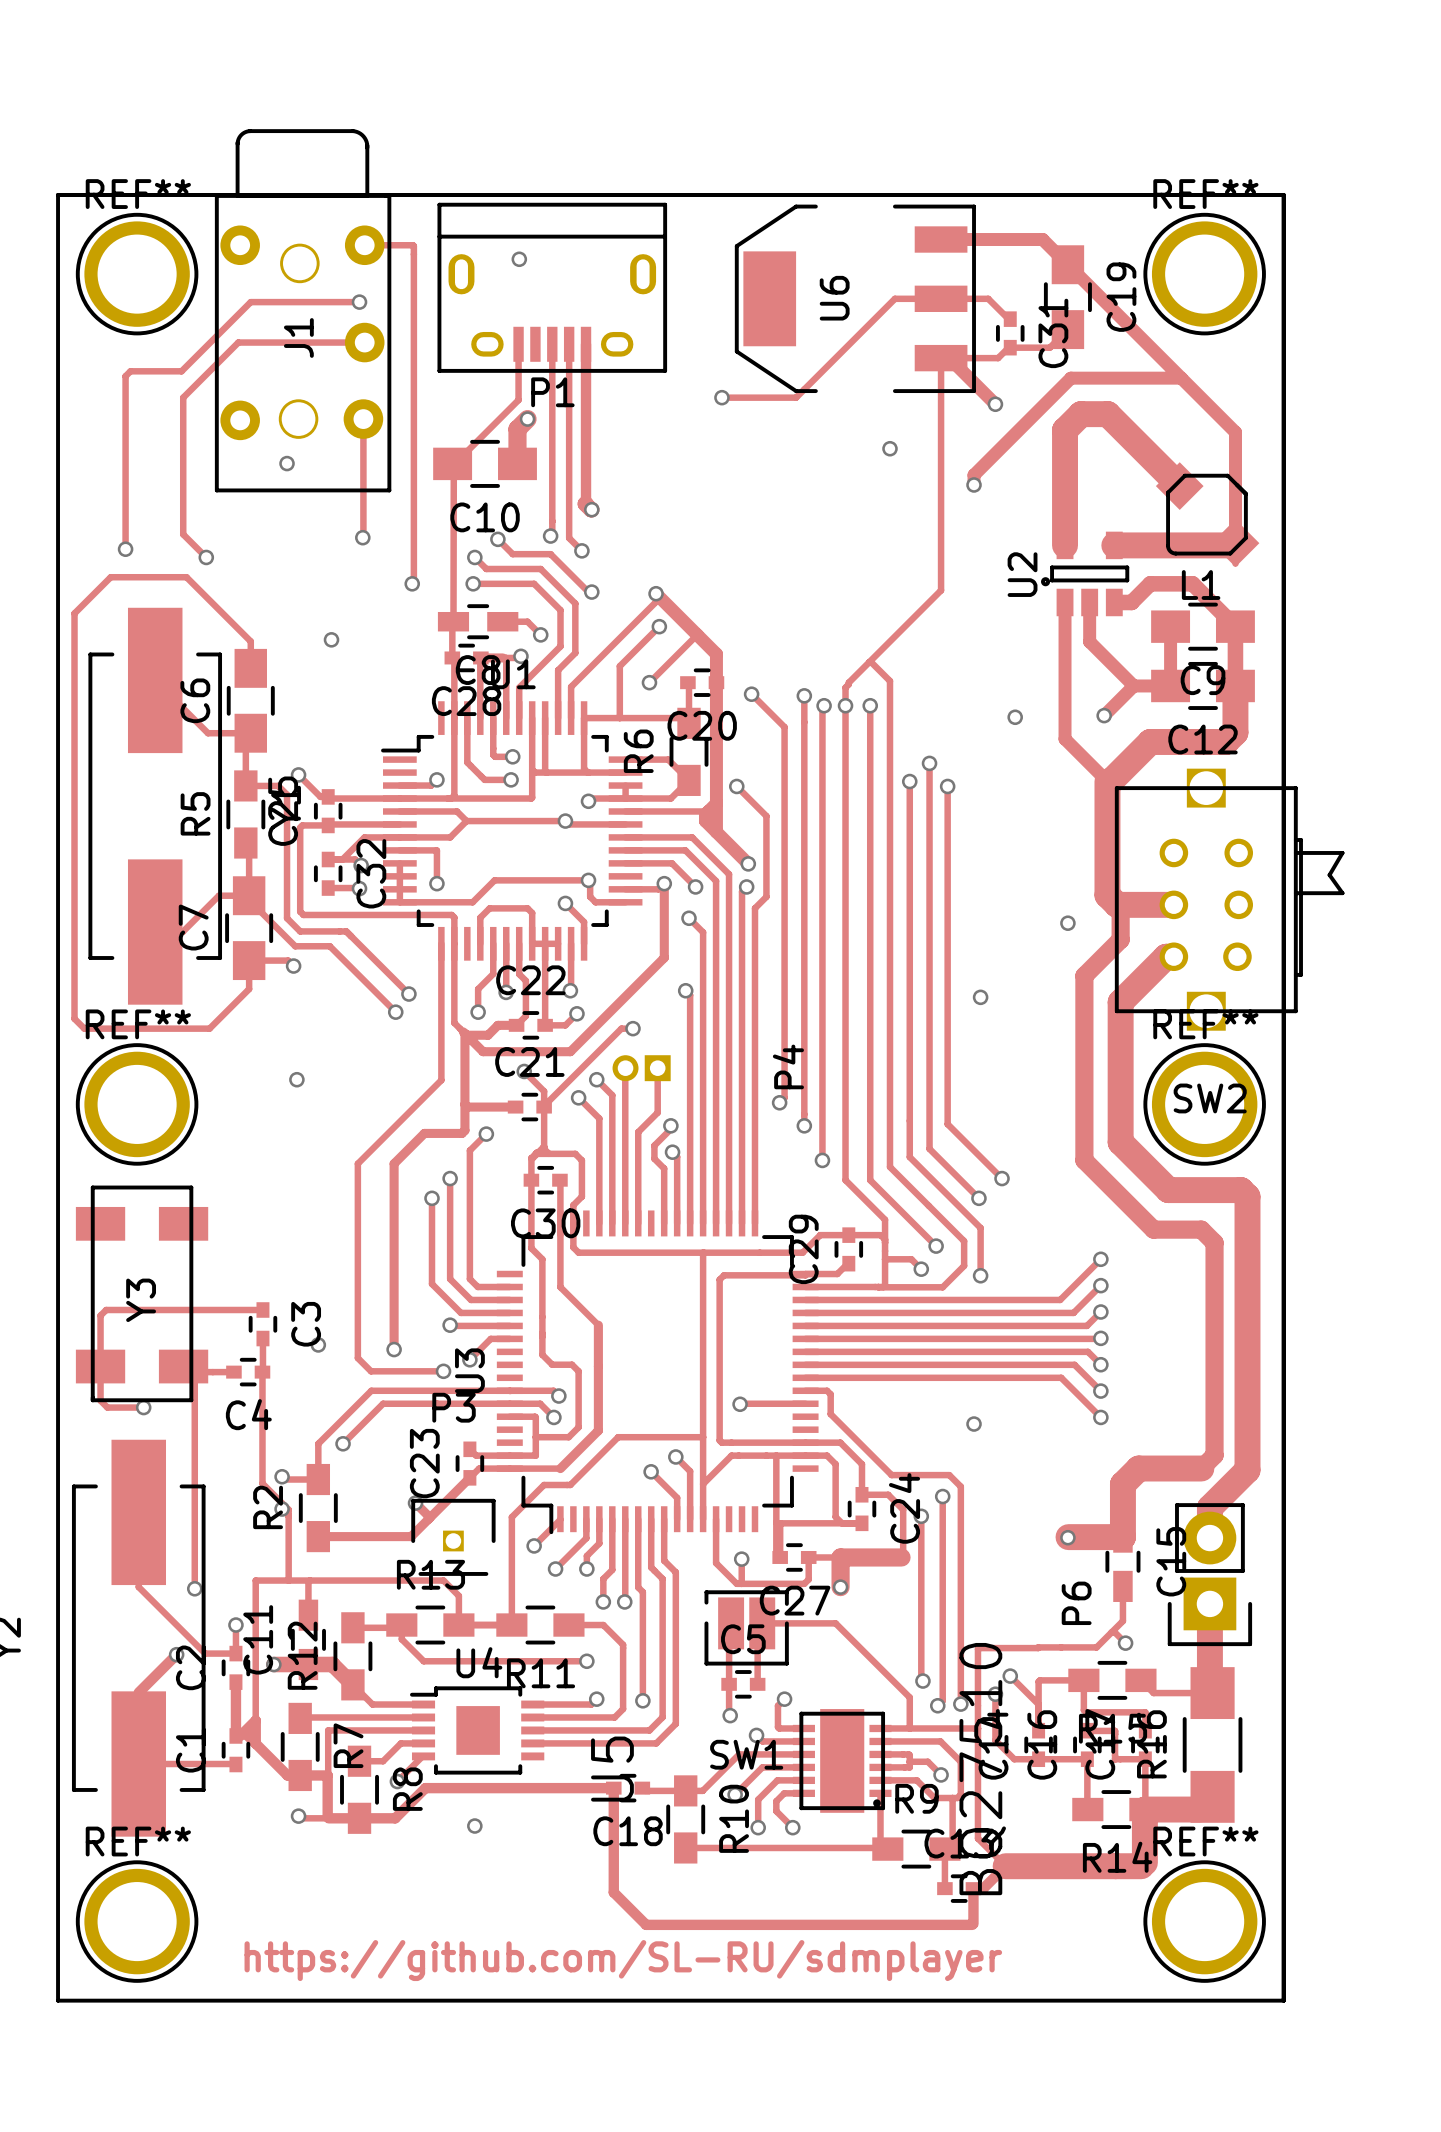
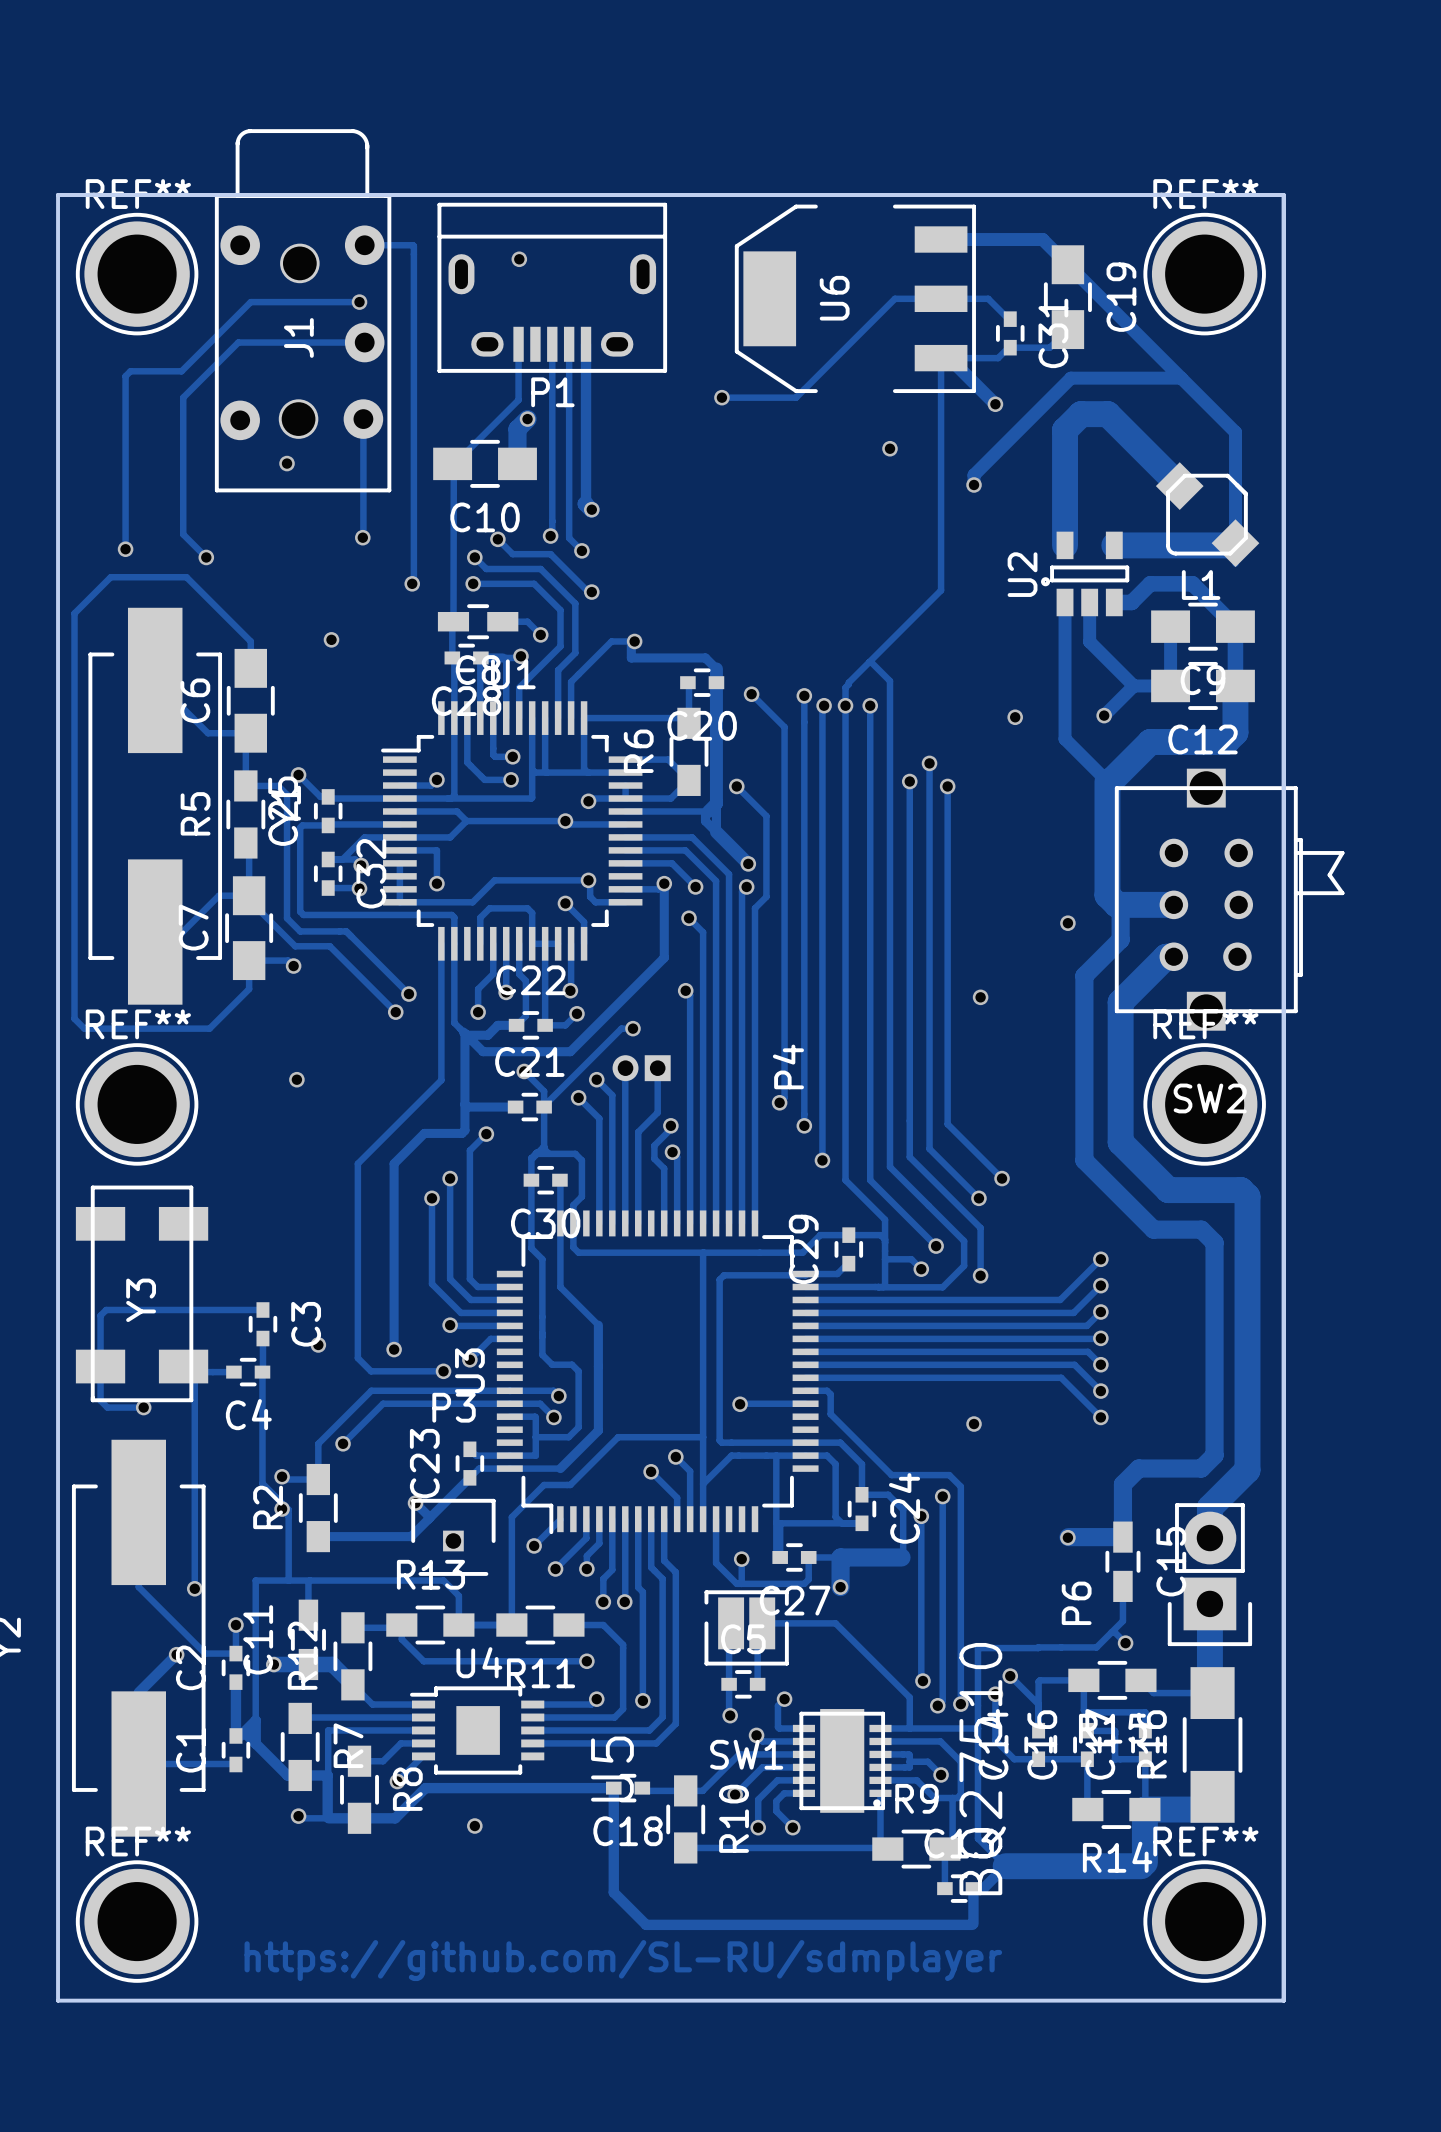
via: (656, 593) -> none
track: (659, 626) (619, 666) (619, 718) -> none
via: (659, 626) -> none
track: (697, 634) (649, 682) -> none
via: none -> (634, 641)
track: (716, 668) (716, 654) (656, 593) (656, 601) (571, 686) -> (716, 668) (705, 657) (631, 657) (631, 644) (634, 641) (611, 641) (571, 681) (571, 686)
via: (649, 682) -> none
track width: thick (716, 803) (716, 832) (705, 821) (705, 814) (708, 811) -> thin (716, 803) (716, 832) (705, 821) (705, 814) (708, 811)
track width: thick (1201, 1468) (1138, 1468) (1122, 1484) (1122, 1537) (1068, 1537) -> thin (1201, 1468) (1138, 1468) (1122, 1484) (1122, 1537) (1068, 1537)

